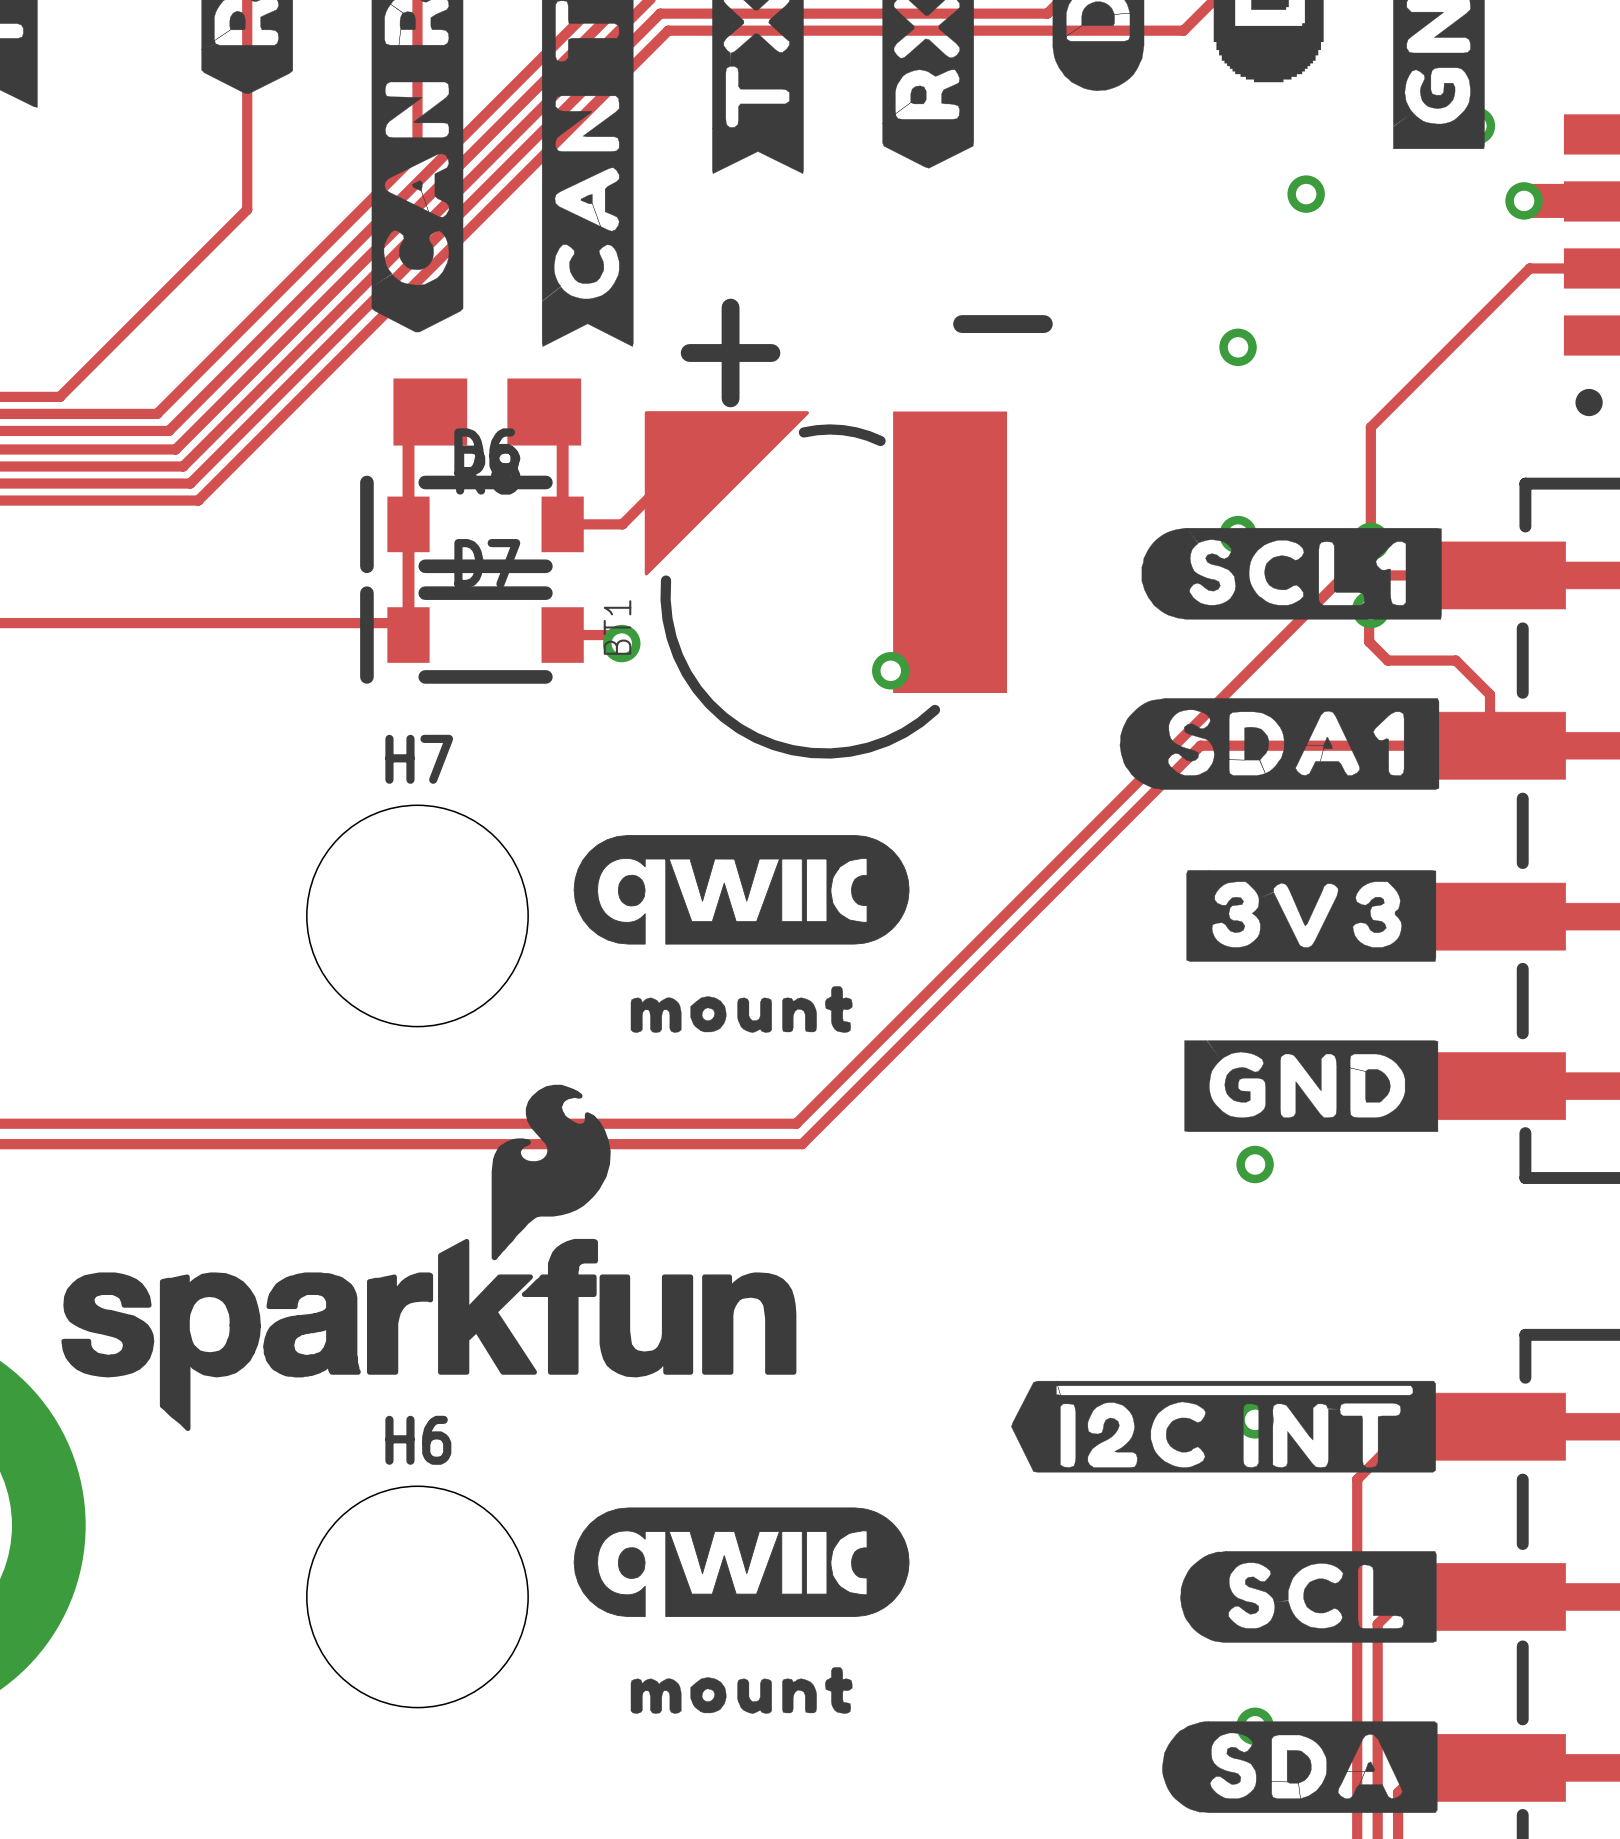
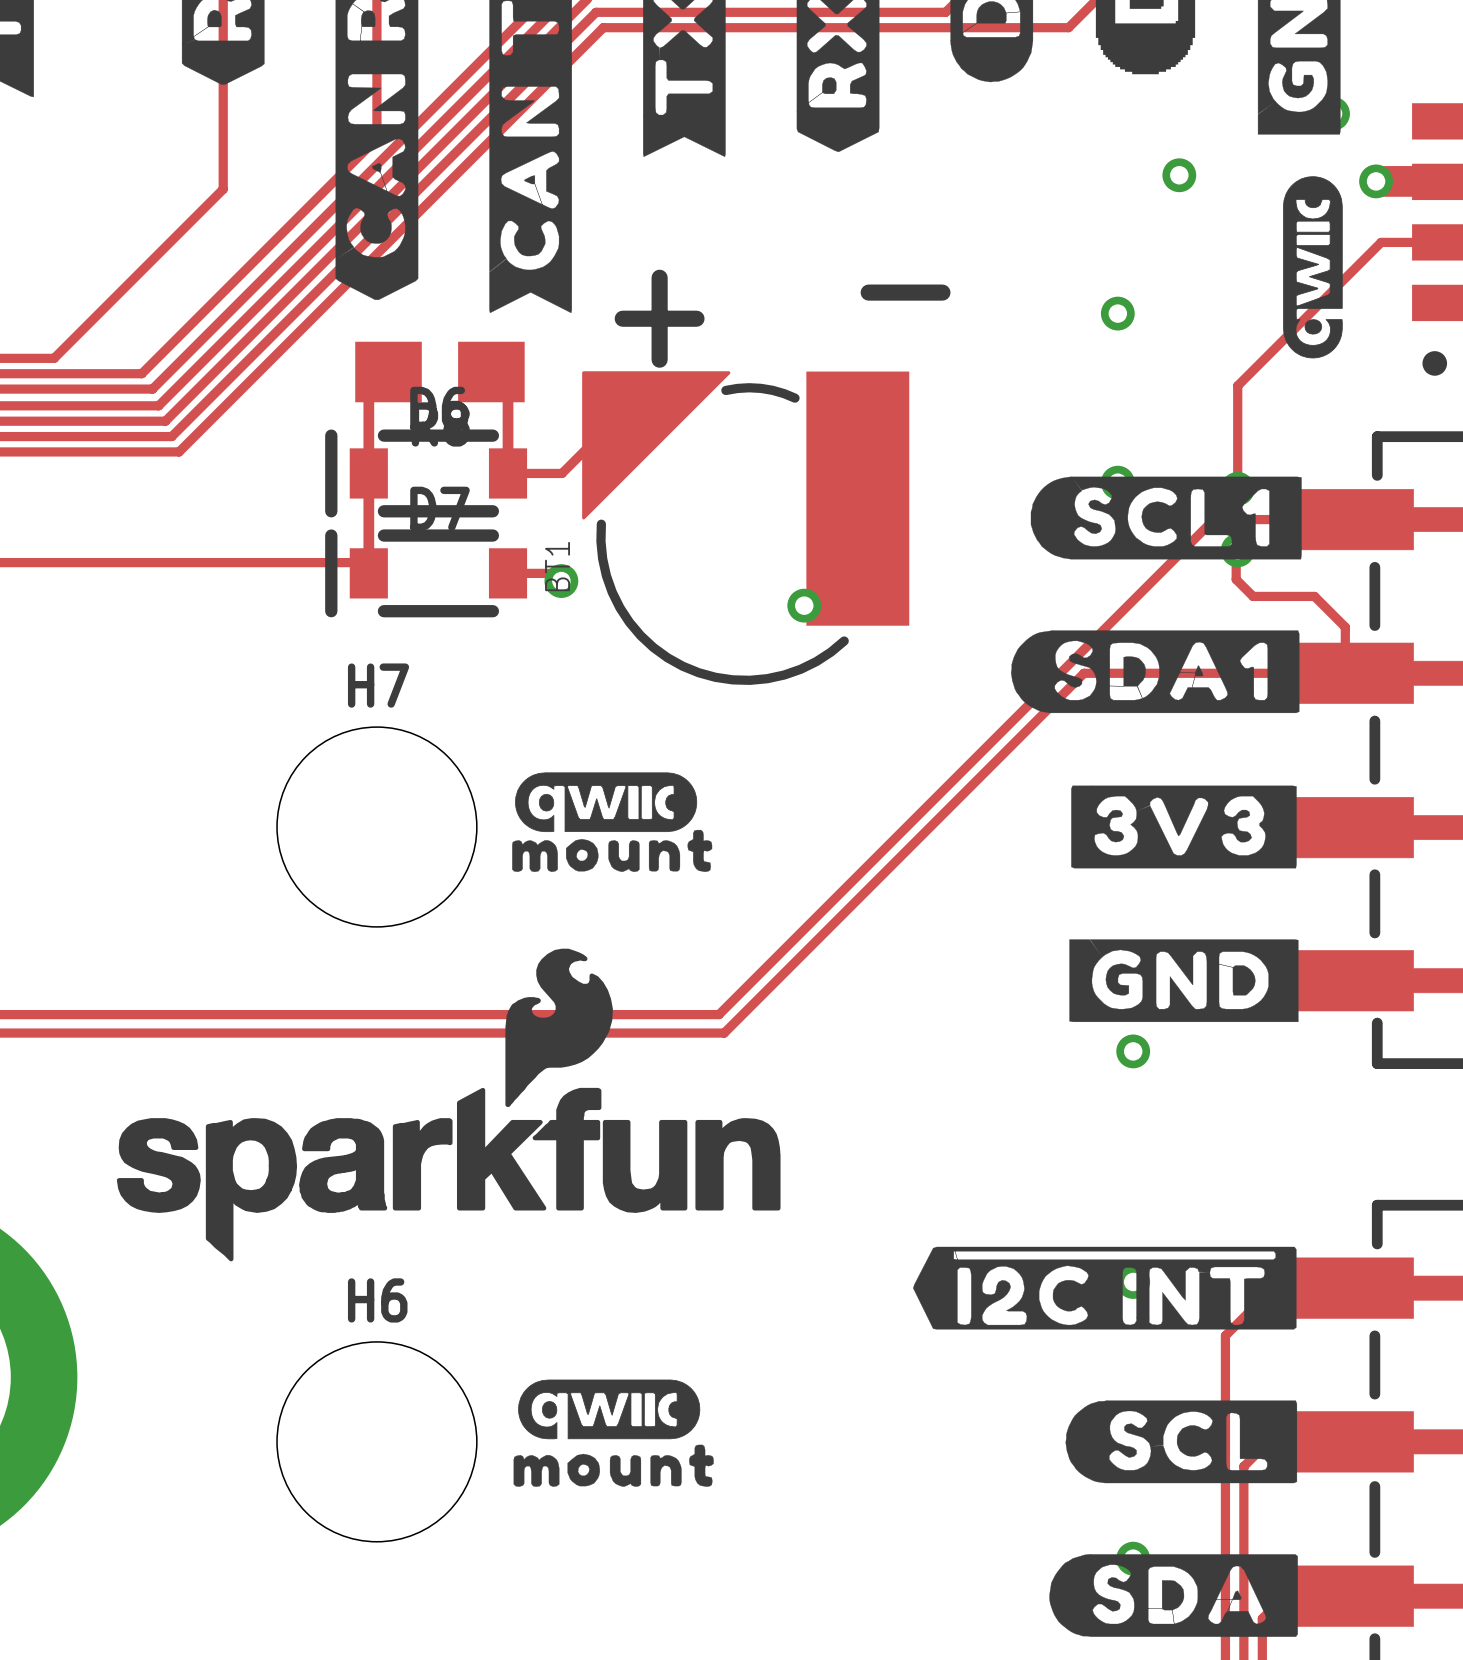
drawing: none -> [1283, 176, 1343, 359]
drawing: [573, 835, 910, 945] -> none
drawing: none -> [515, 772, 698, 833]
drawing position: (741, 1009) -> (612, 850)
drawing position: (428, 1257) -> (448, 1105)
drawing shape: [573, 1507, 910, 1618] -> [518, 1379, 701, 1440]
drawing position: (741, 1690) -> (613, 1465)

